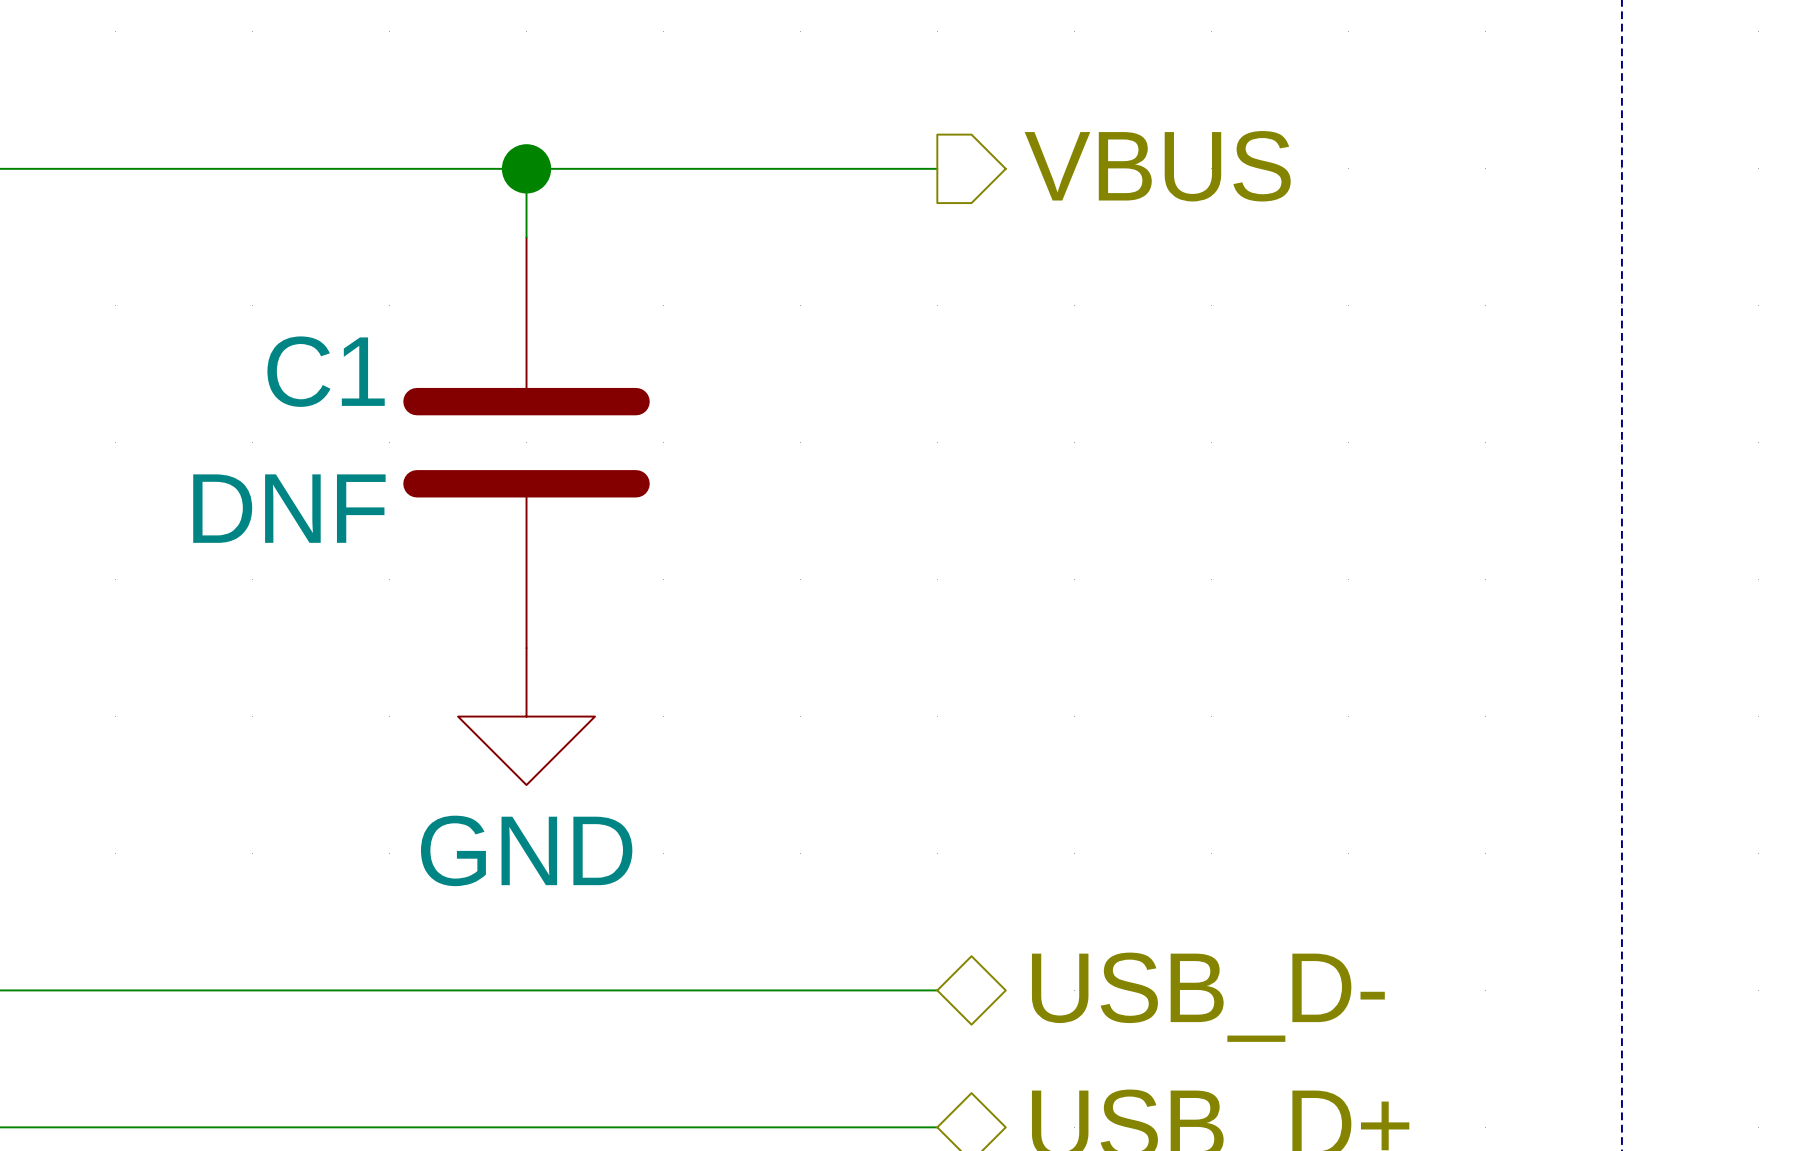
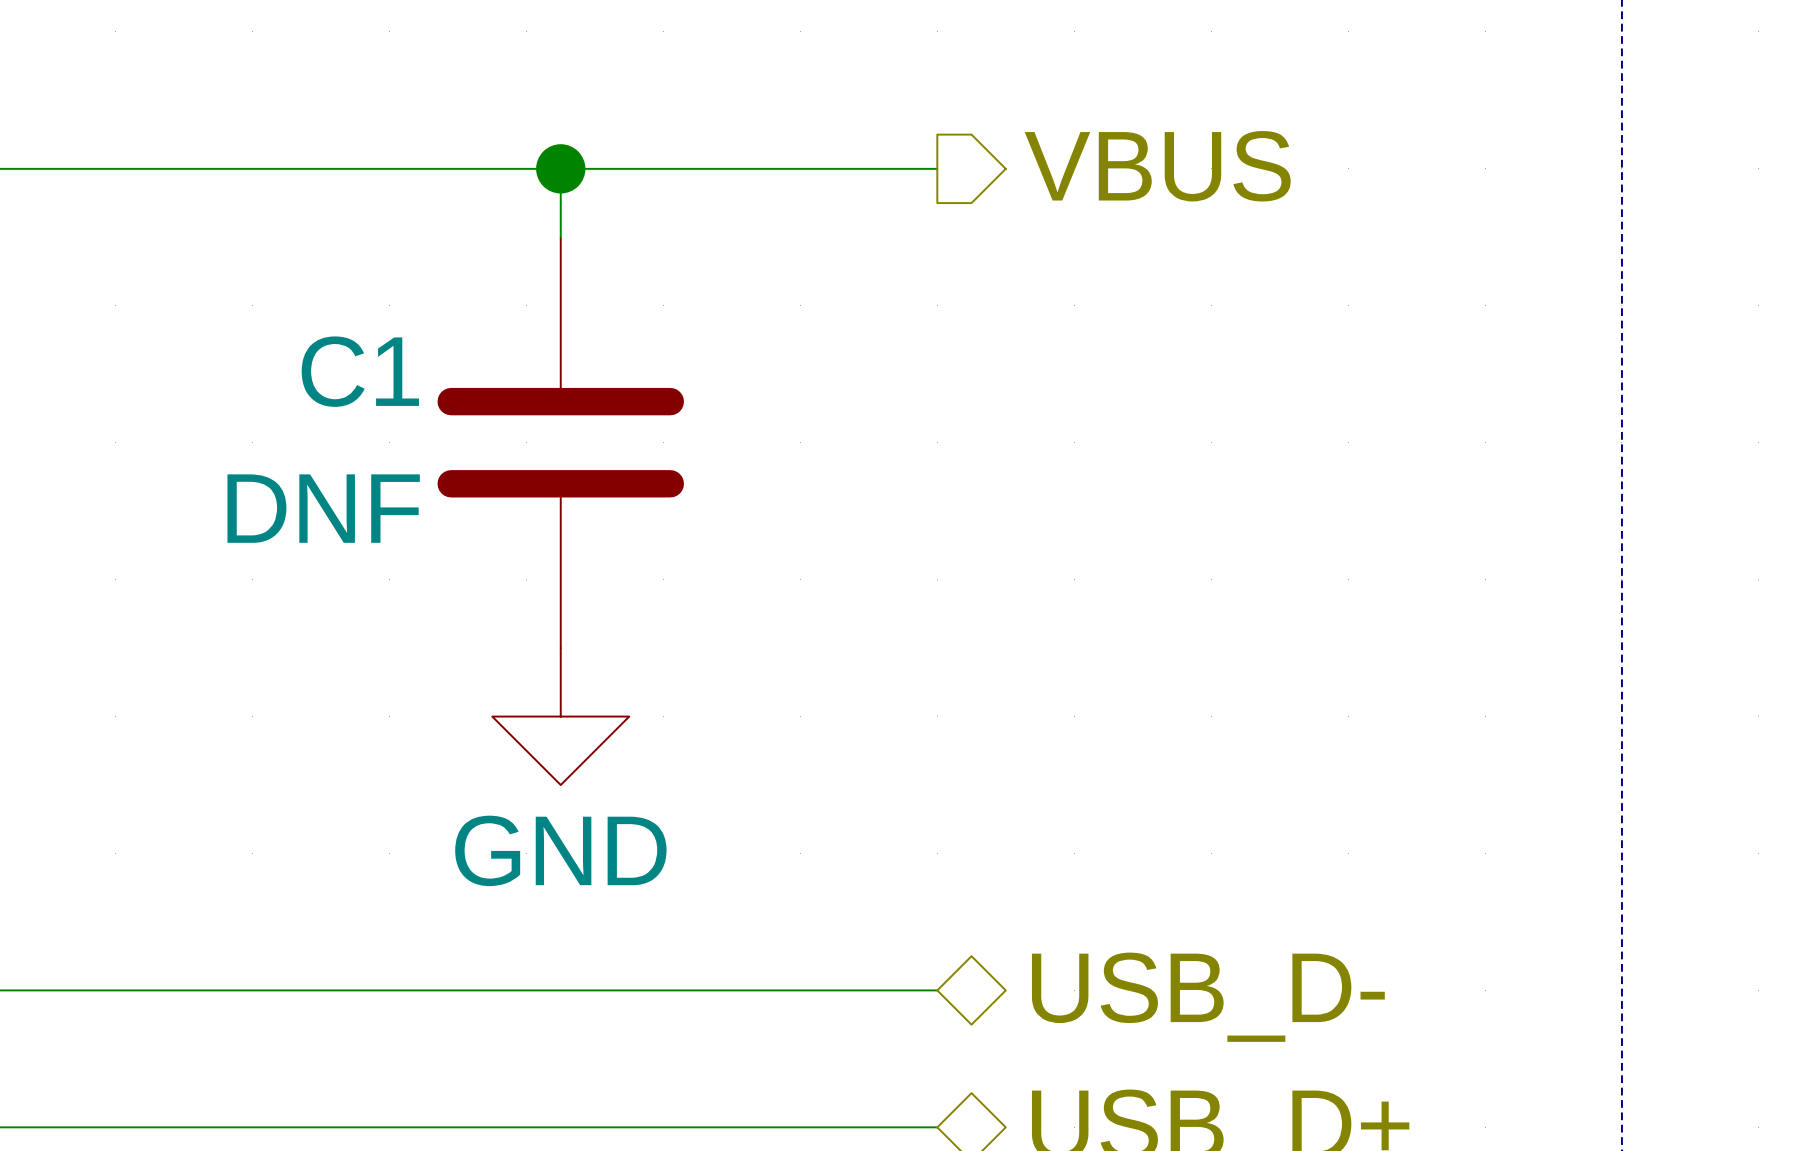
wire: (526, 168) (526, 237) -> (560, 168) (560, 237)
junction position: (526, 168) -> (560, 168)
C1 position: (526, 442) -> (560, 442)
power symbol position: GND (526, 716) -> GND (560, 716)

